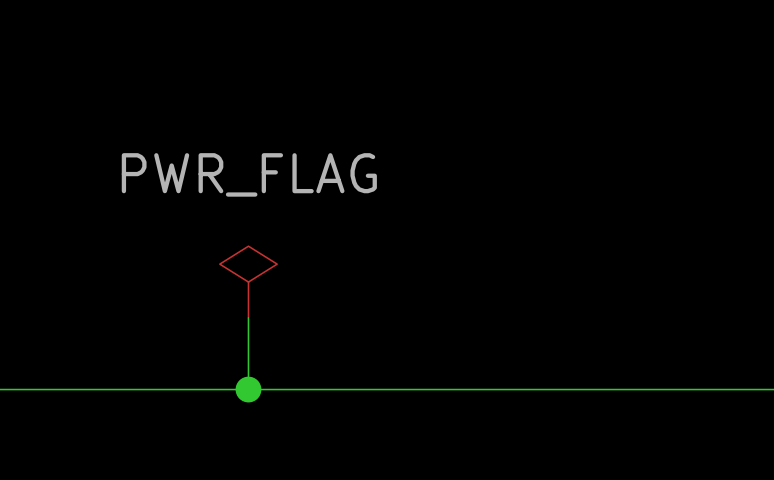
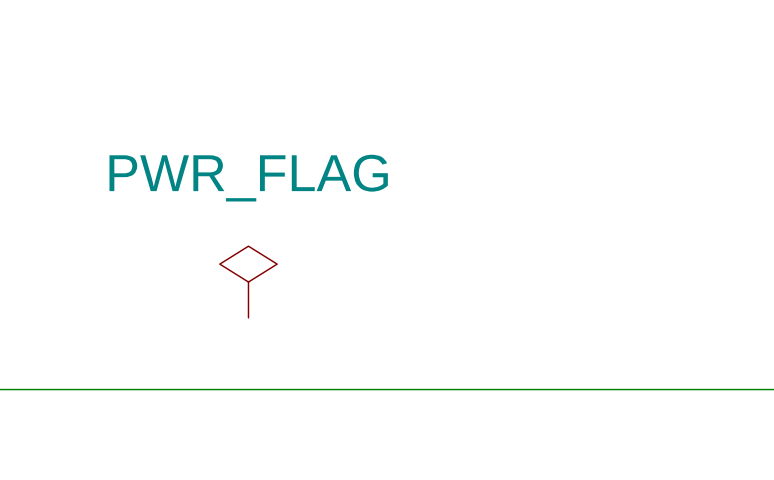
wire: (248, 317) (248, 389) -> none
junction: (248, 389) -> none

